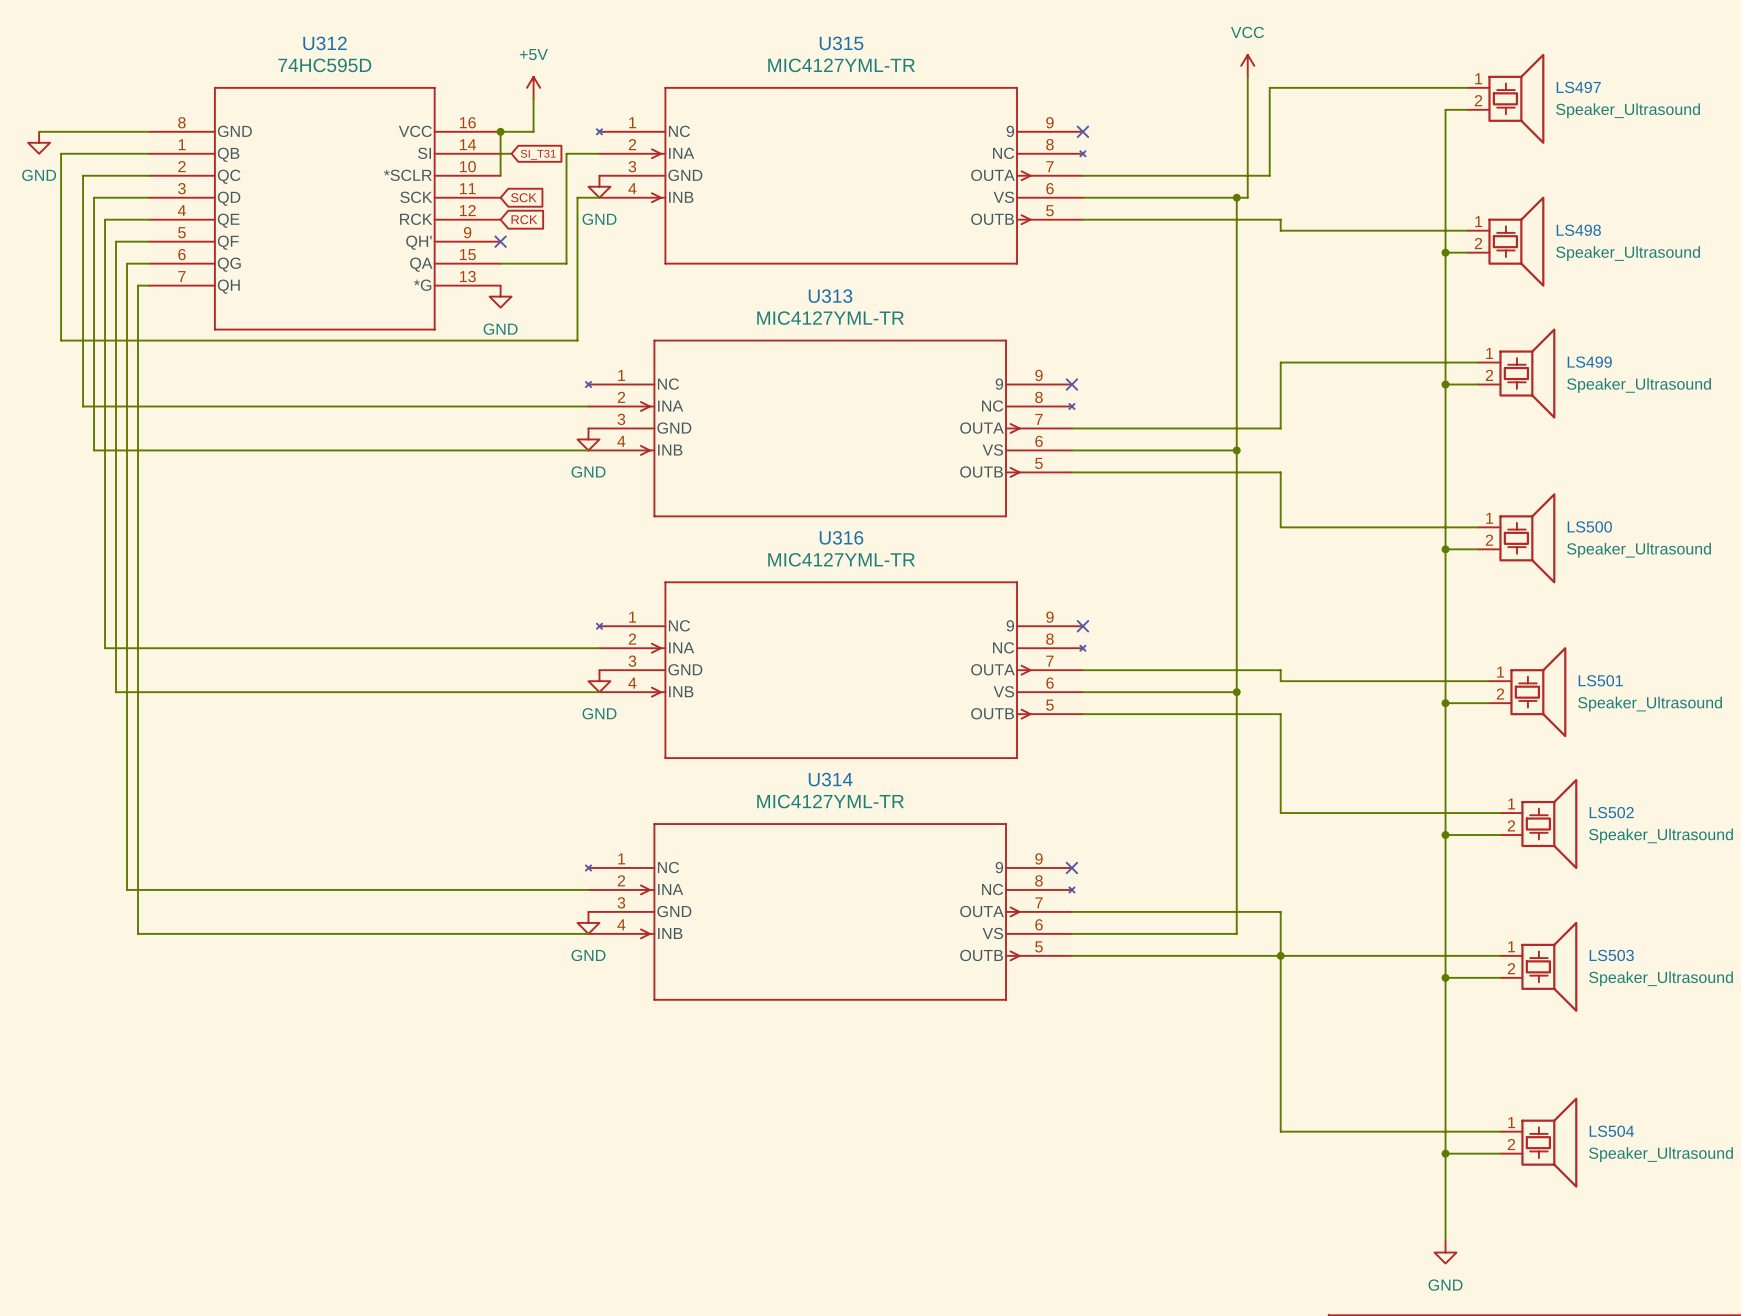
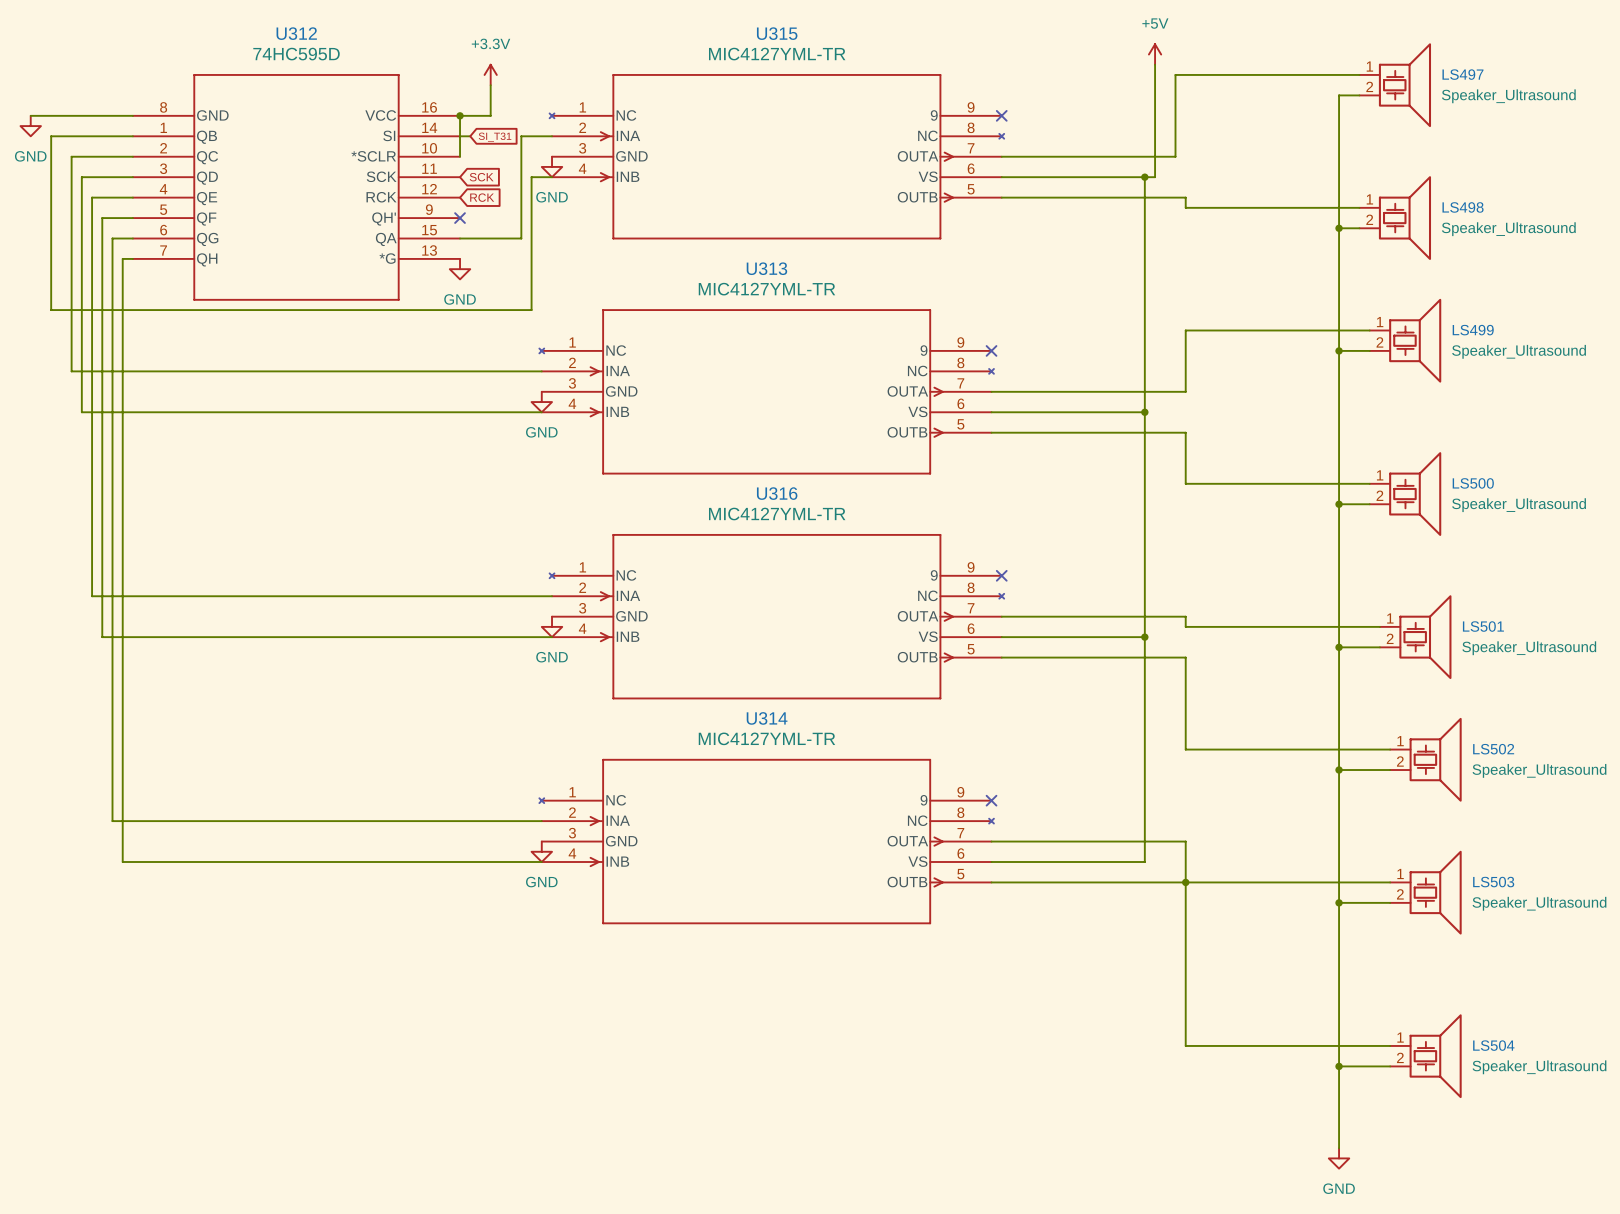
power symbol: VCC (1247, 65) -> +5V (1155, 54)
power symbol: +5V (533, 87) -> +3.3V (490, 74)

